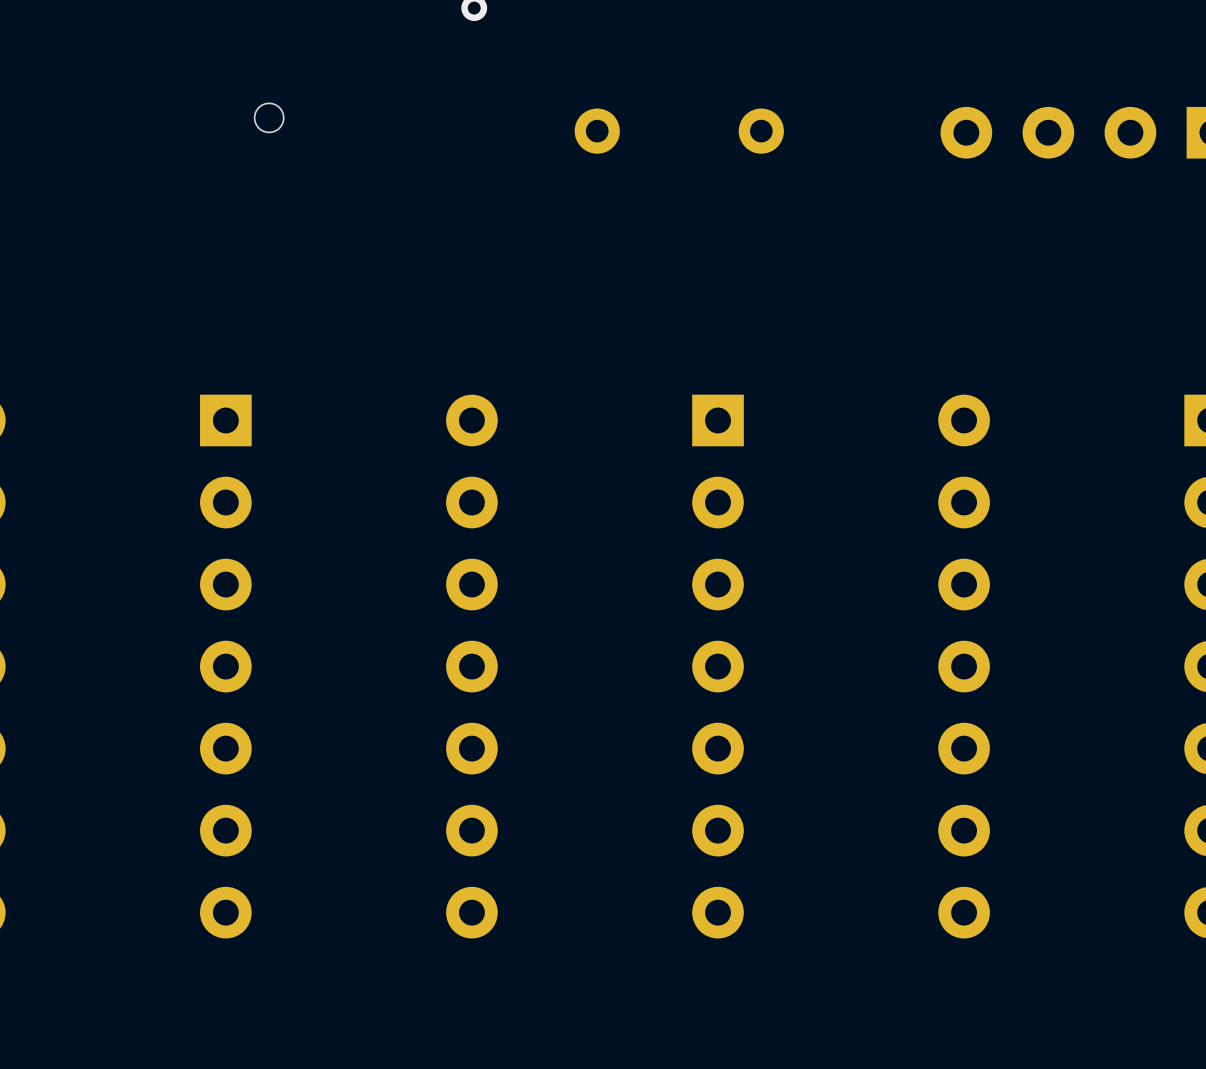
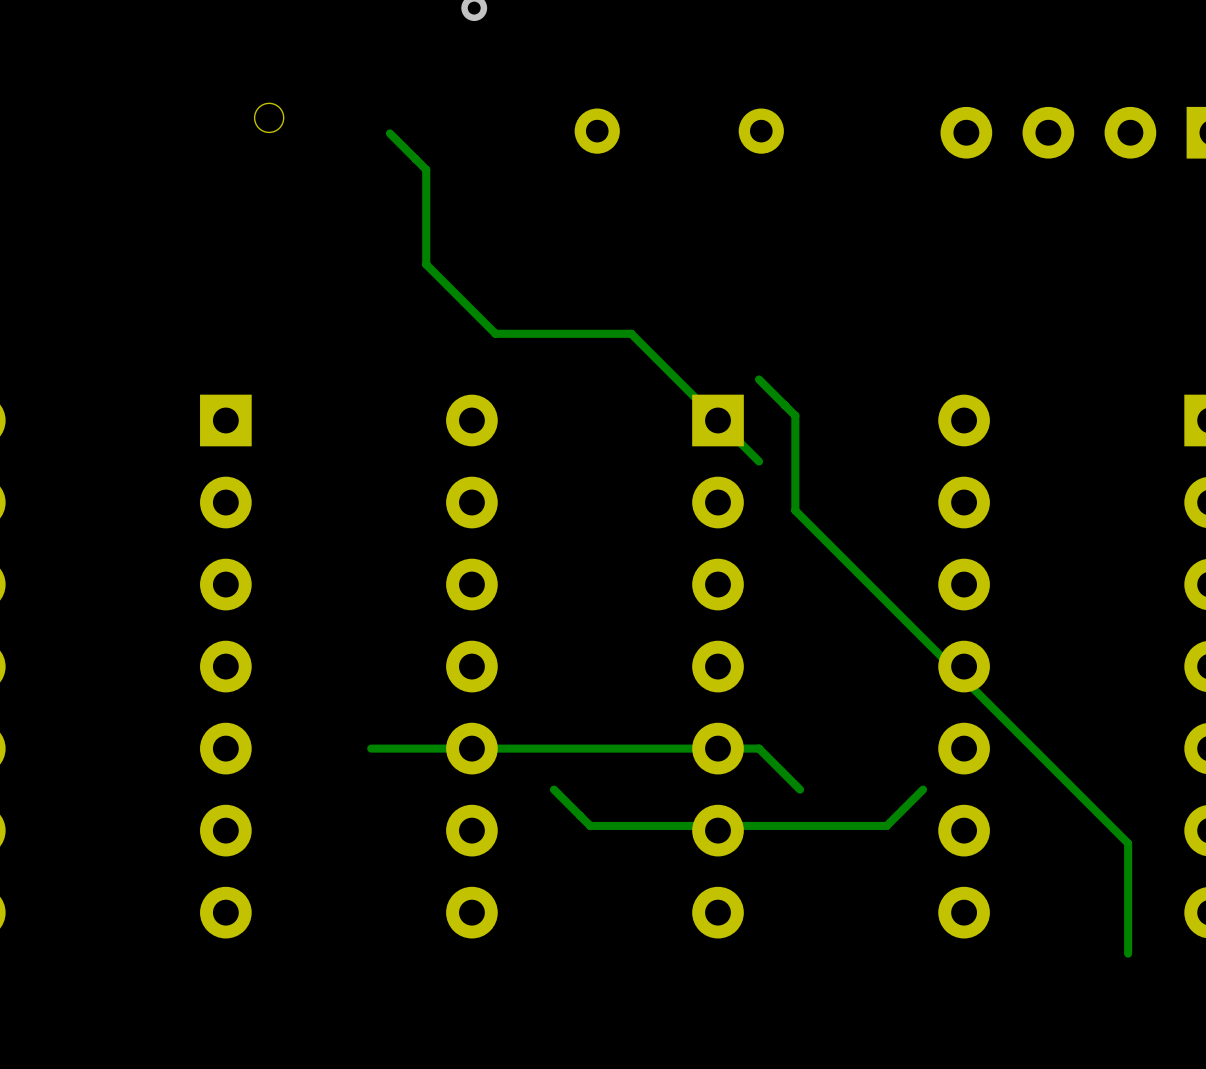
track: none -> (389, 133) (426, 169) (426, 264) (495, 333) (631, 333) (759, 461)
track: none -> (759, 379) (795, 415) (795, 510) (1128, 843) (1128, 953)
track: none -> (371, 748) (759, 748) (800, 789)
track: none -> (923, 789) (886, 825) (590, 825) (553, 789)

